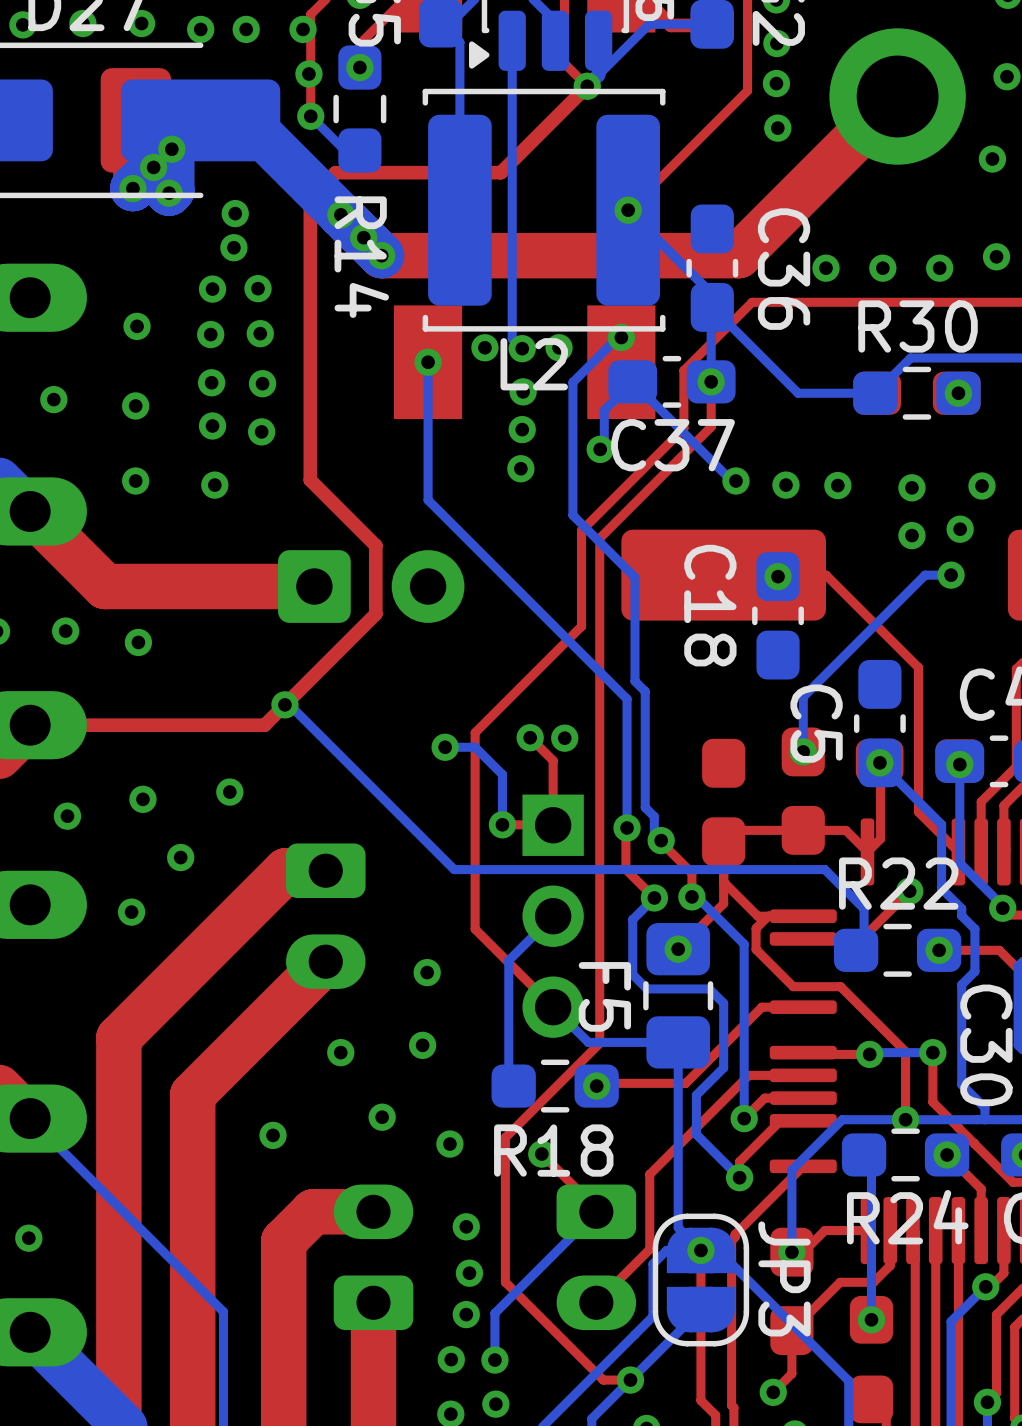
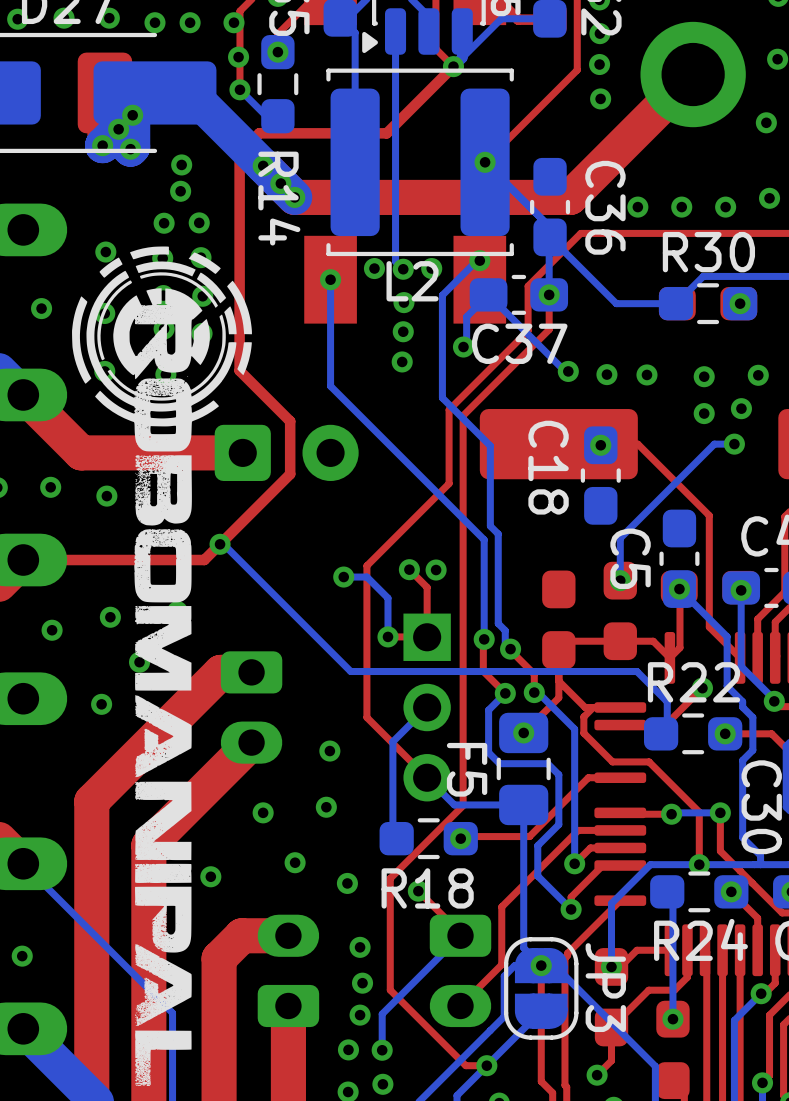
drawing: none -> [72, 246, 252, 1087]

